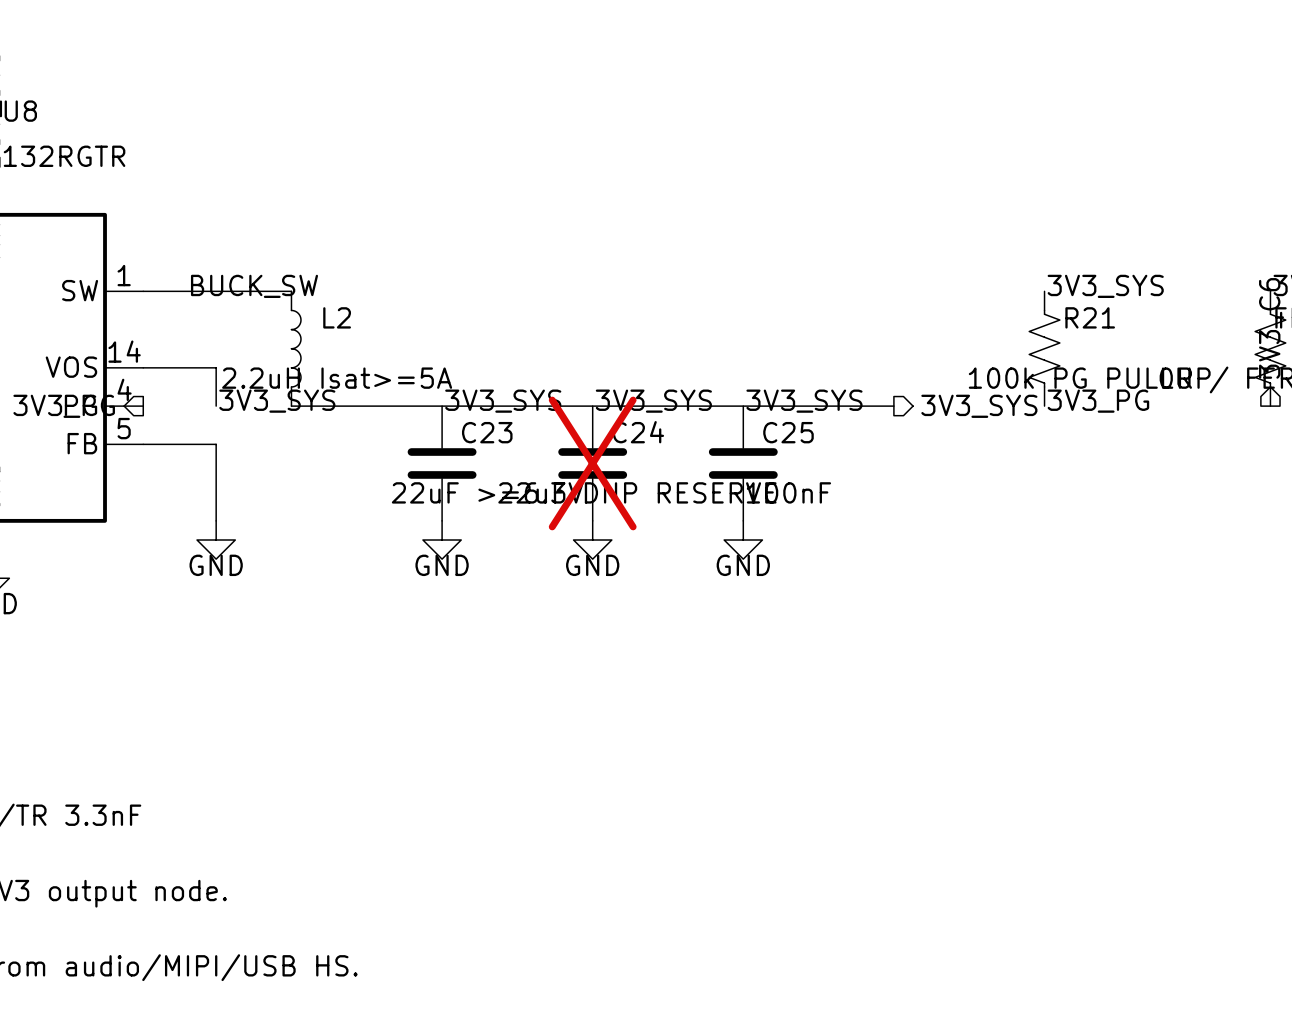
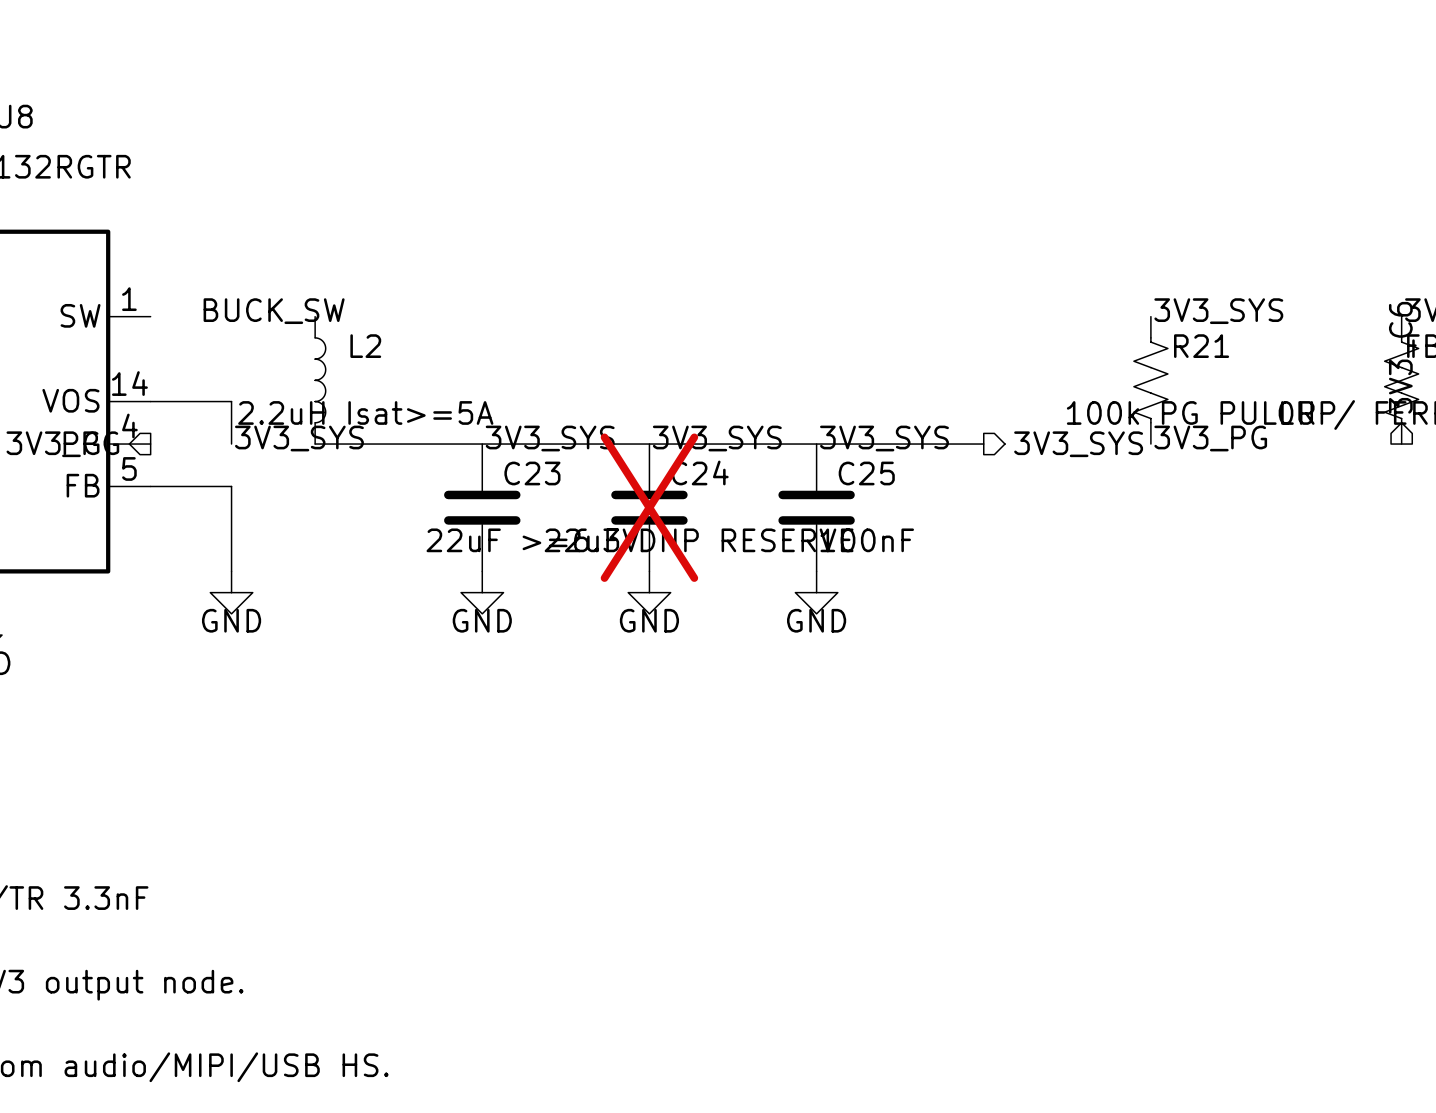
wire: (143, 291) (291, 291) -> none

